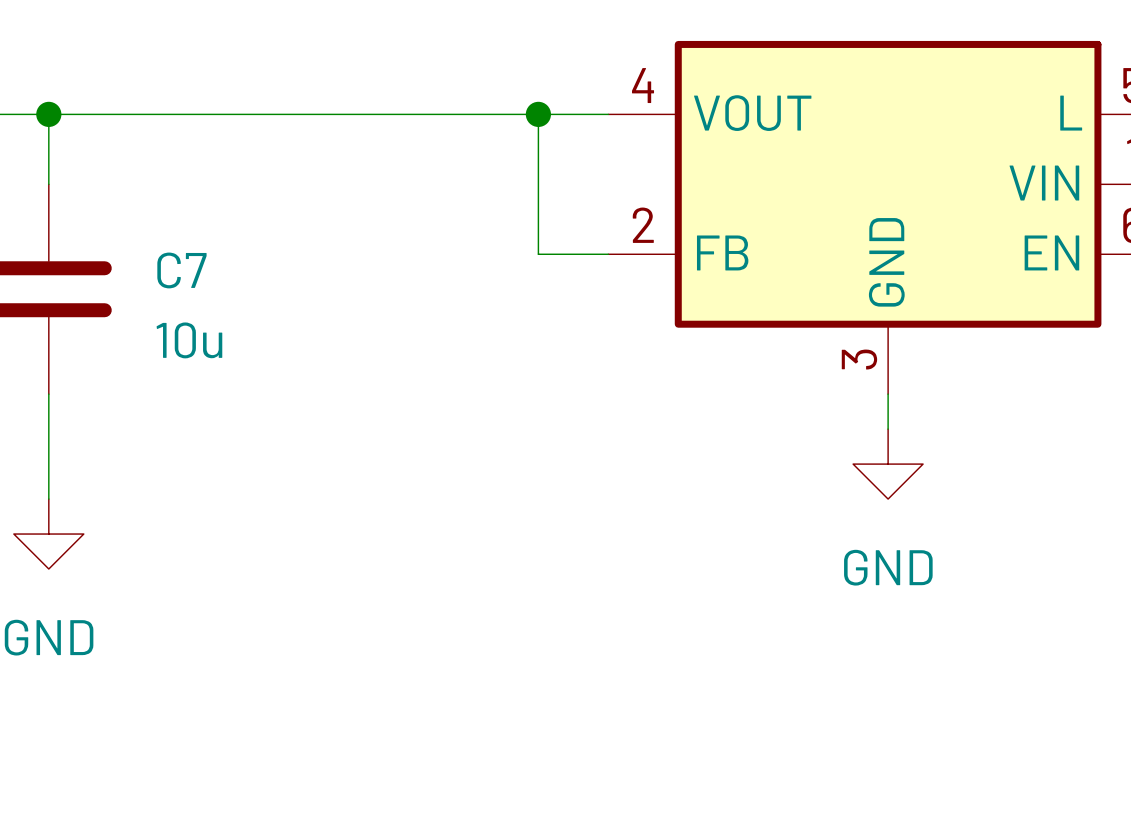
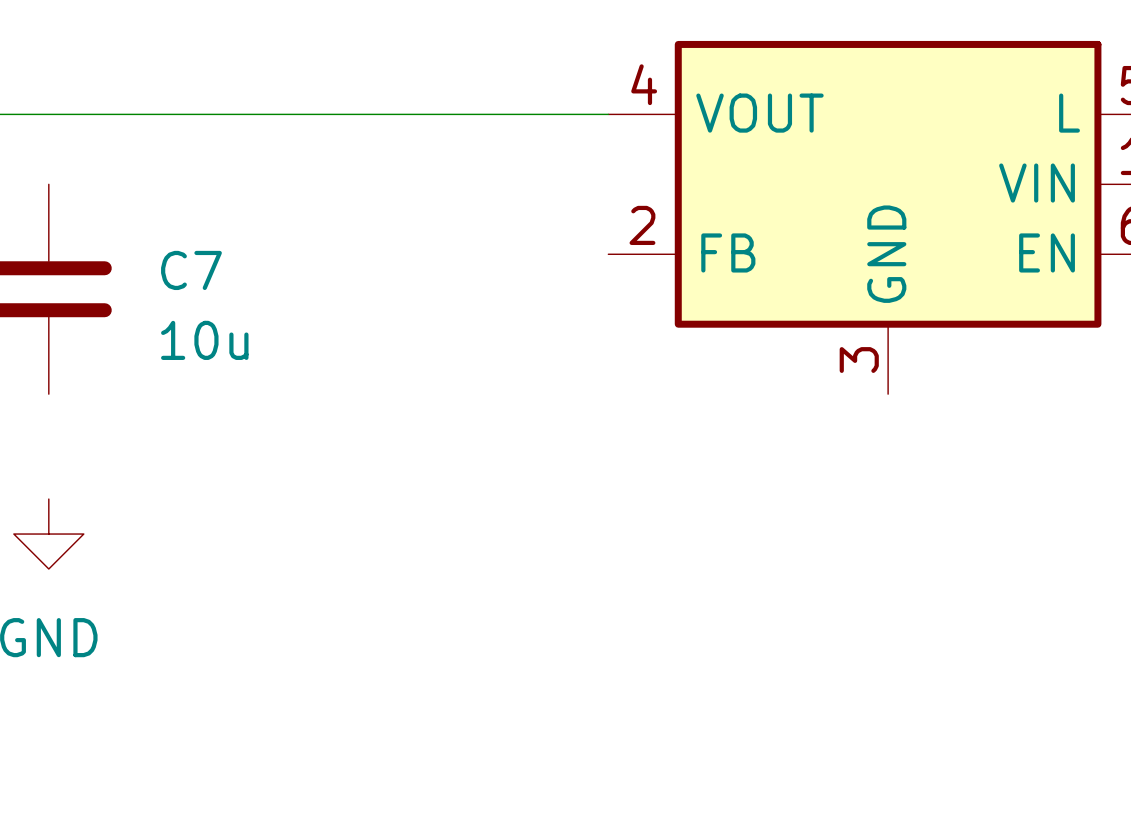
wire: (48, 114) (48, 184) -> none
junction: (48, 114) -> none
wire: (538, 114) (538, 254) (608, 254) -> none
junction: (538, 114) -> none
wire: (48, 394) (48, 499) -> none
wire: (888, 394) (888, 429) -> none
power symbol: GND (888, 464) -> none

